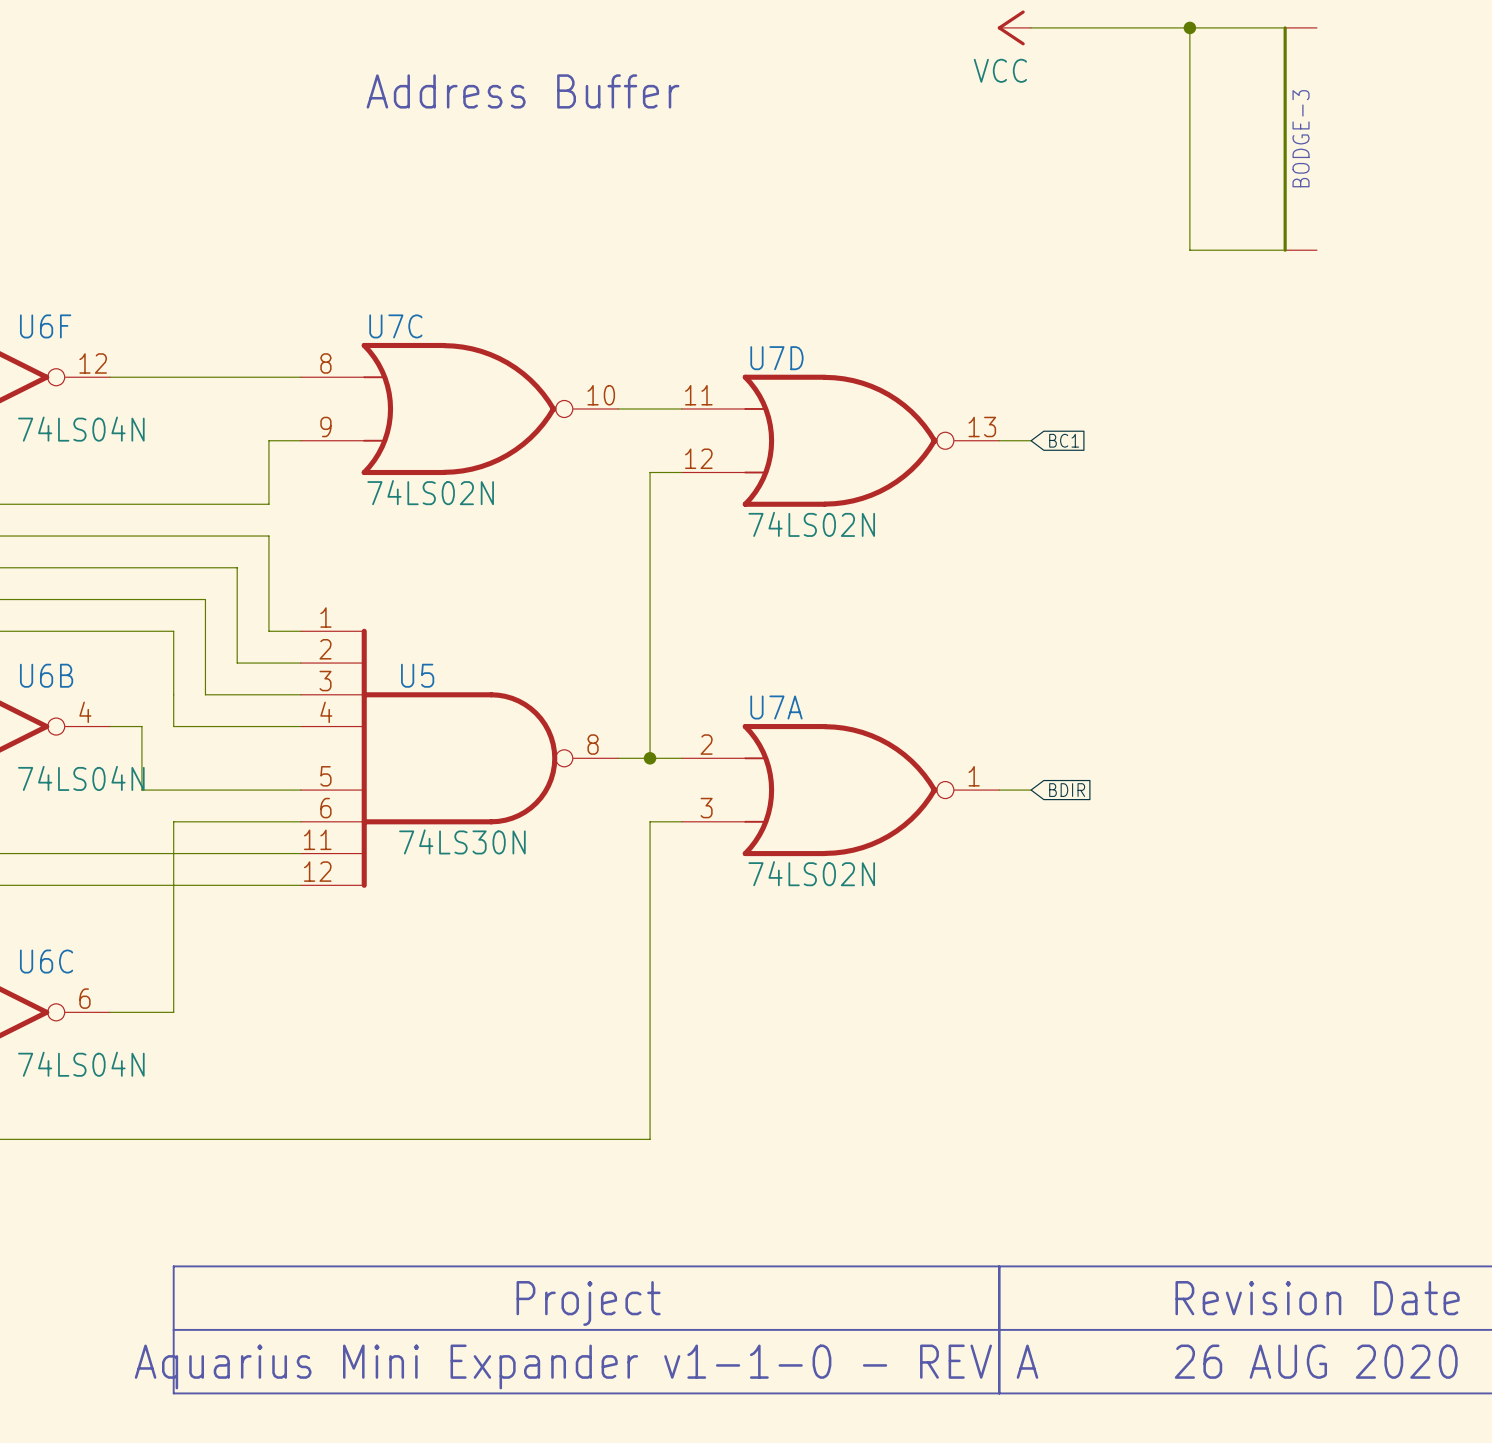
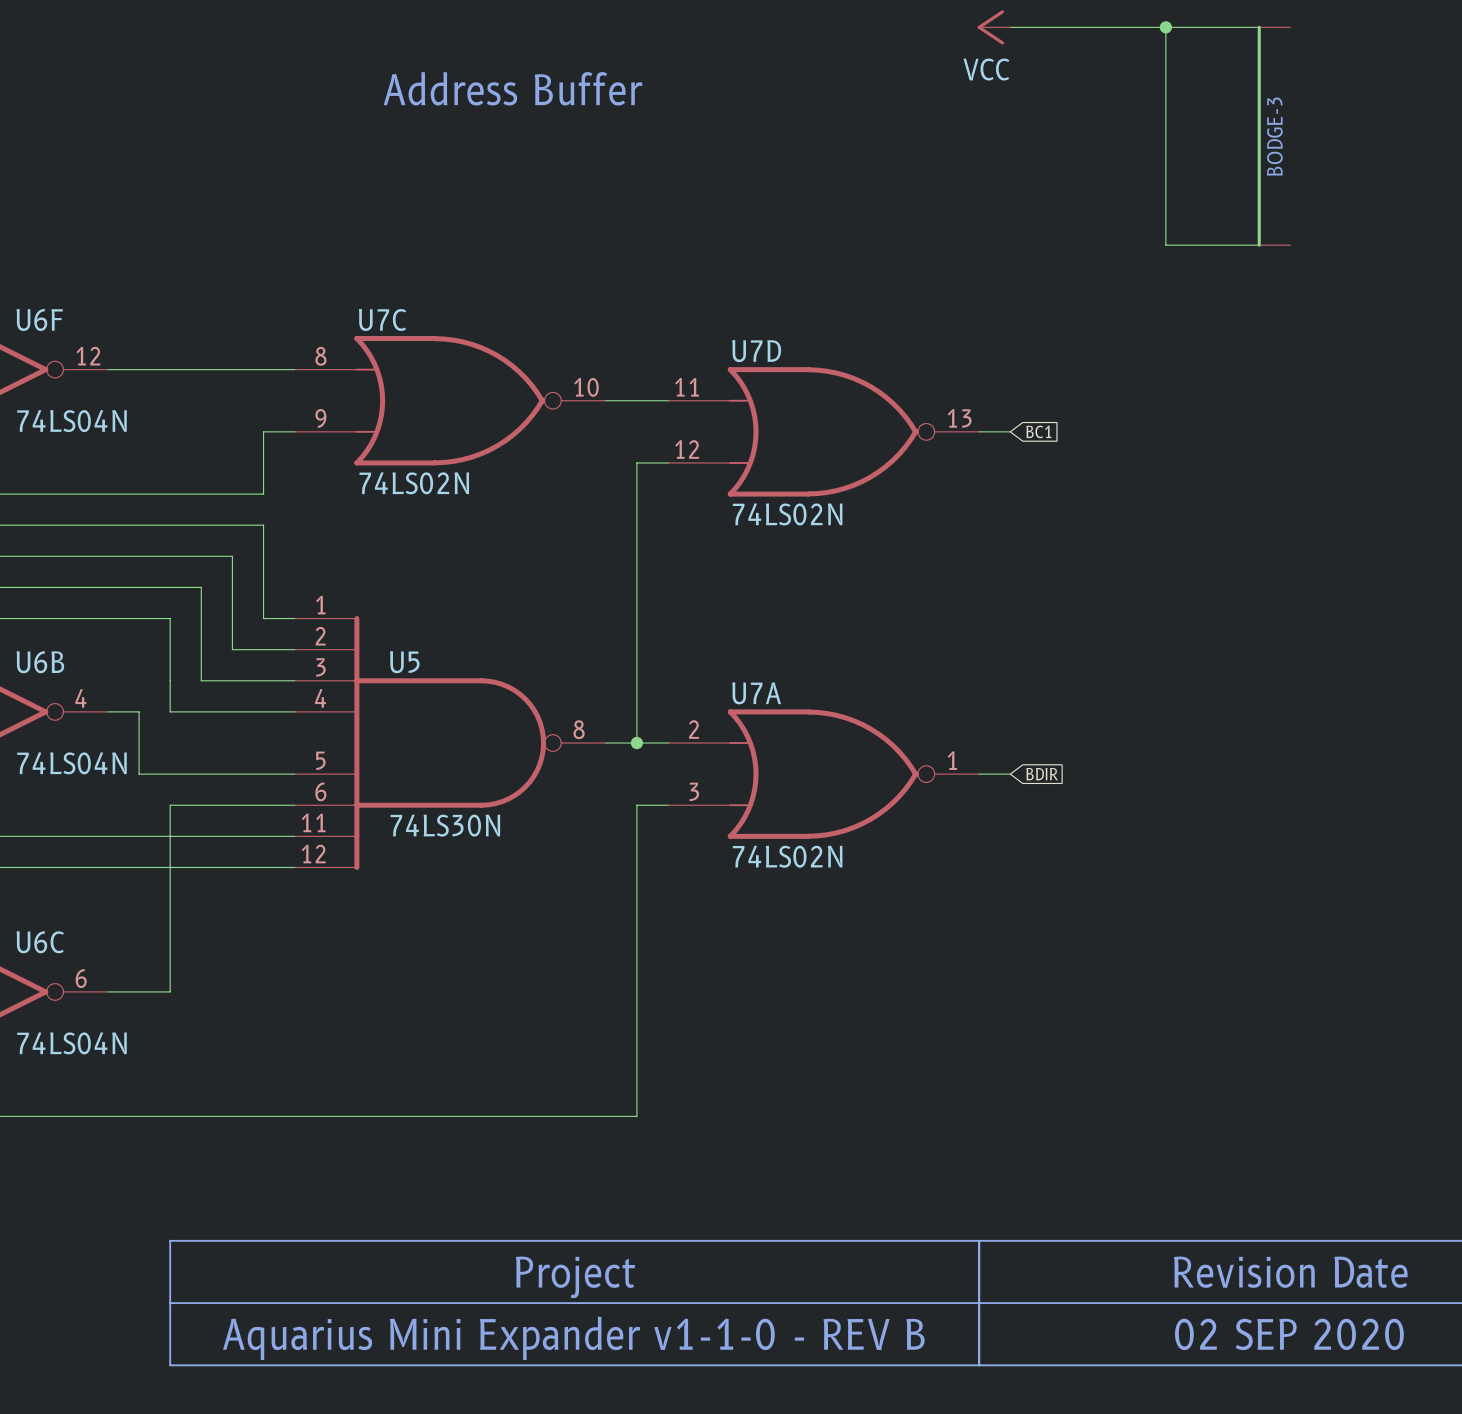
text: 26 AUG 2020 (1316, 1361) -> 02 SEP 2020 (1289, 1334)
text: Aquarius Mini Expander v1-1-0 - REV A (586, 1366) -> Aquarius Mini Expander v1-1-0 - REV B (573, 1338)

